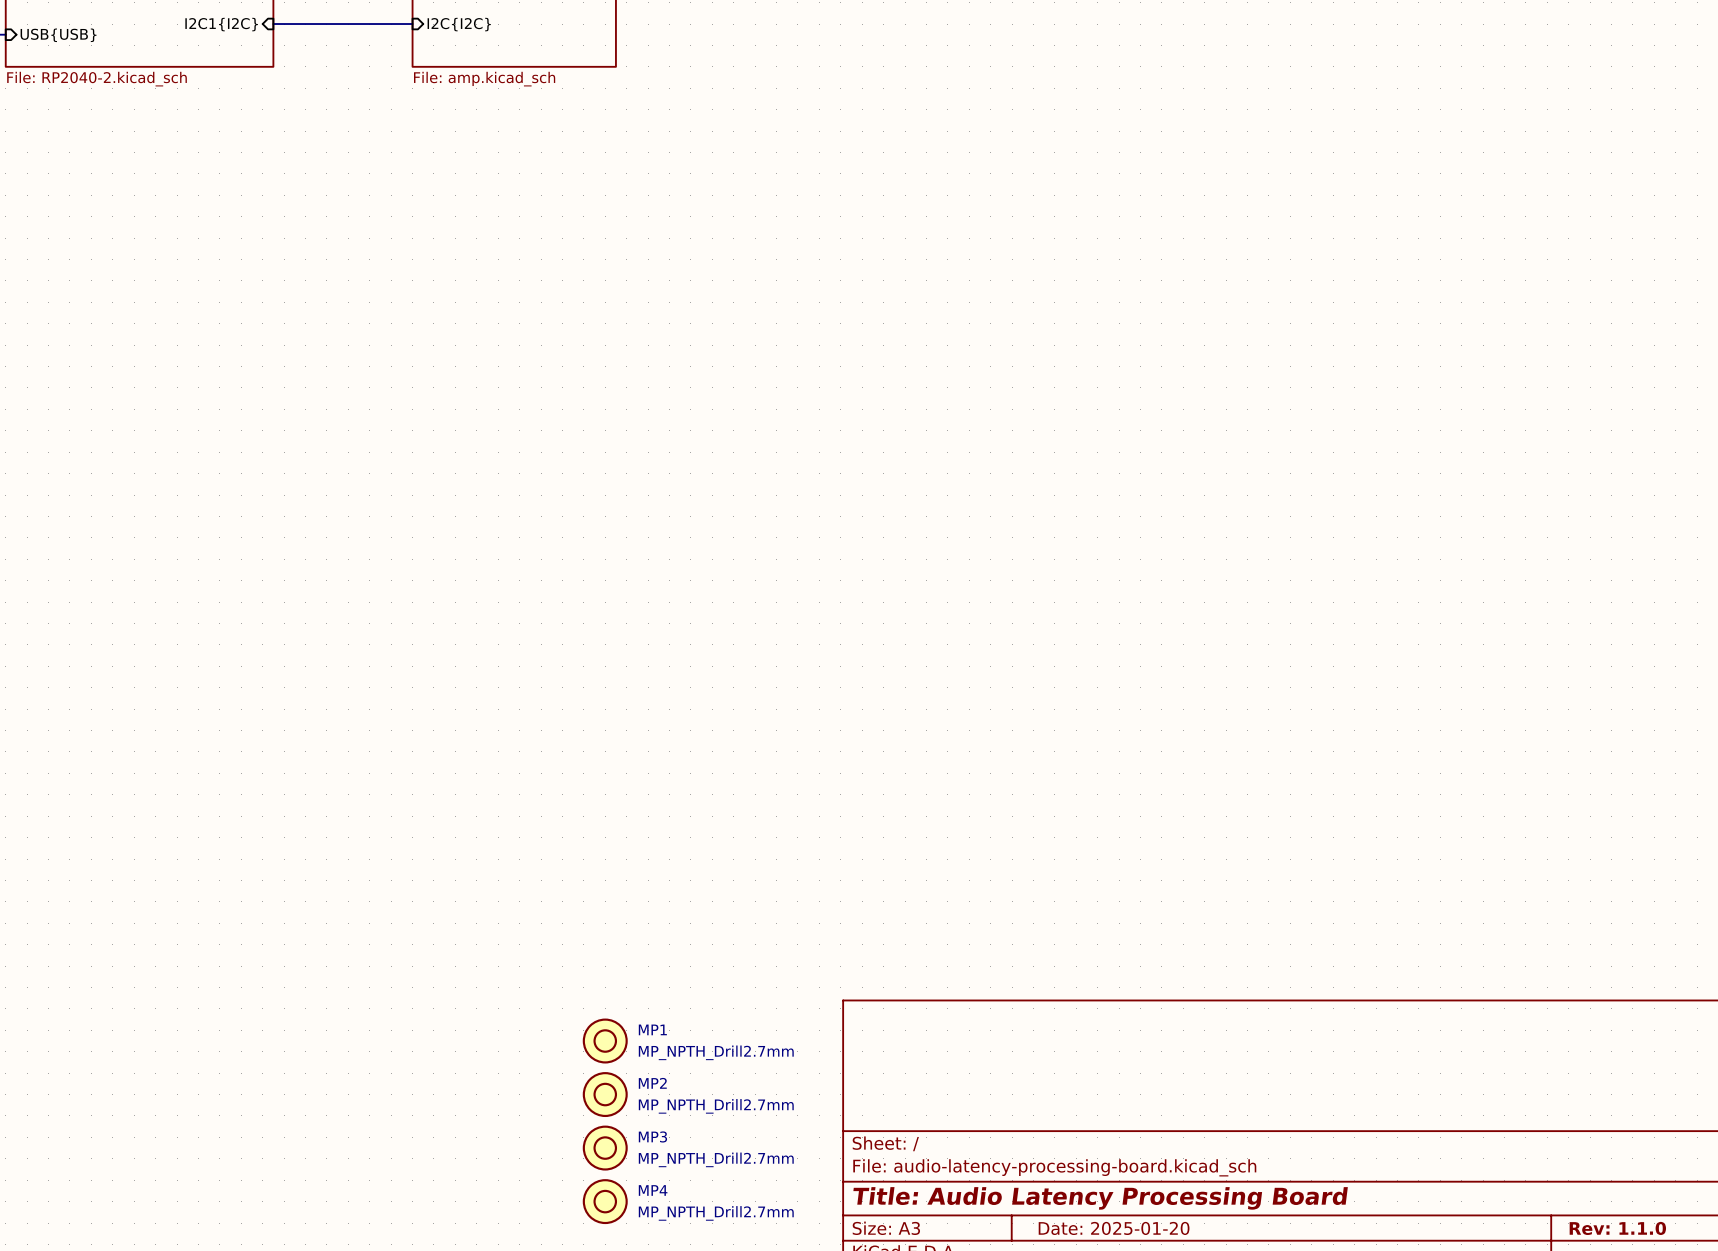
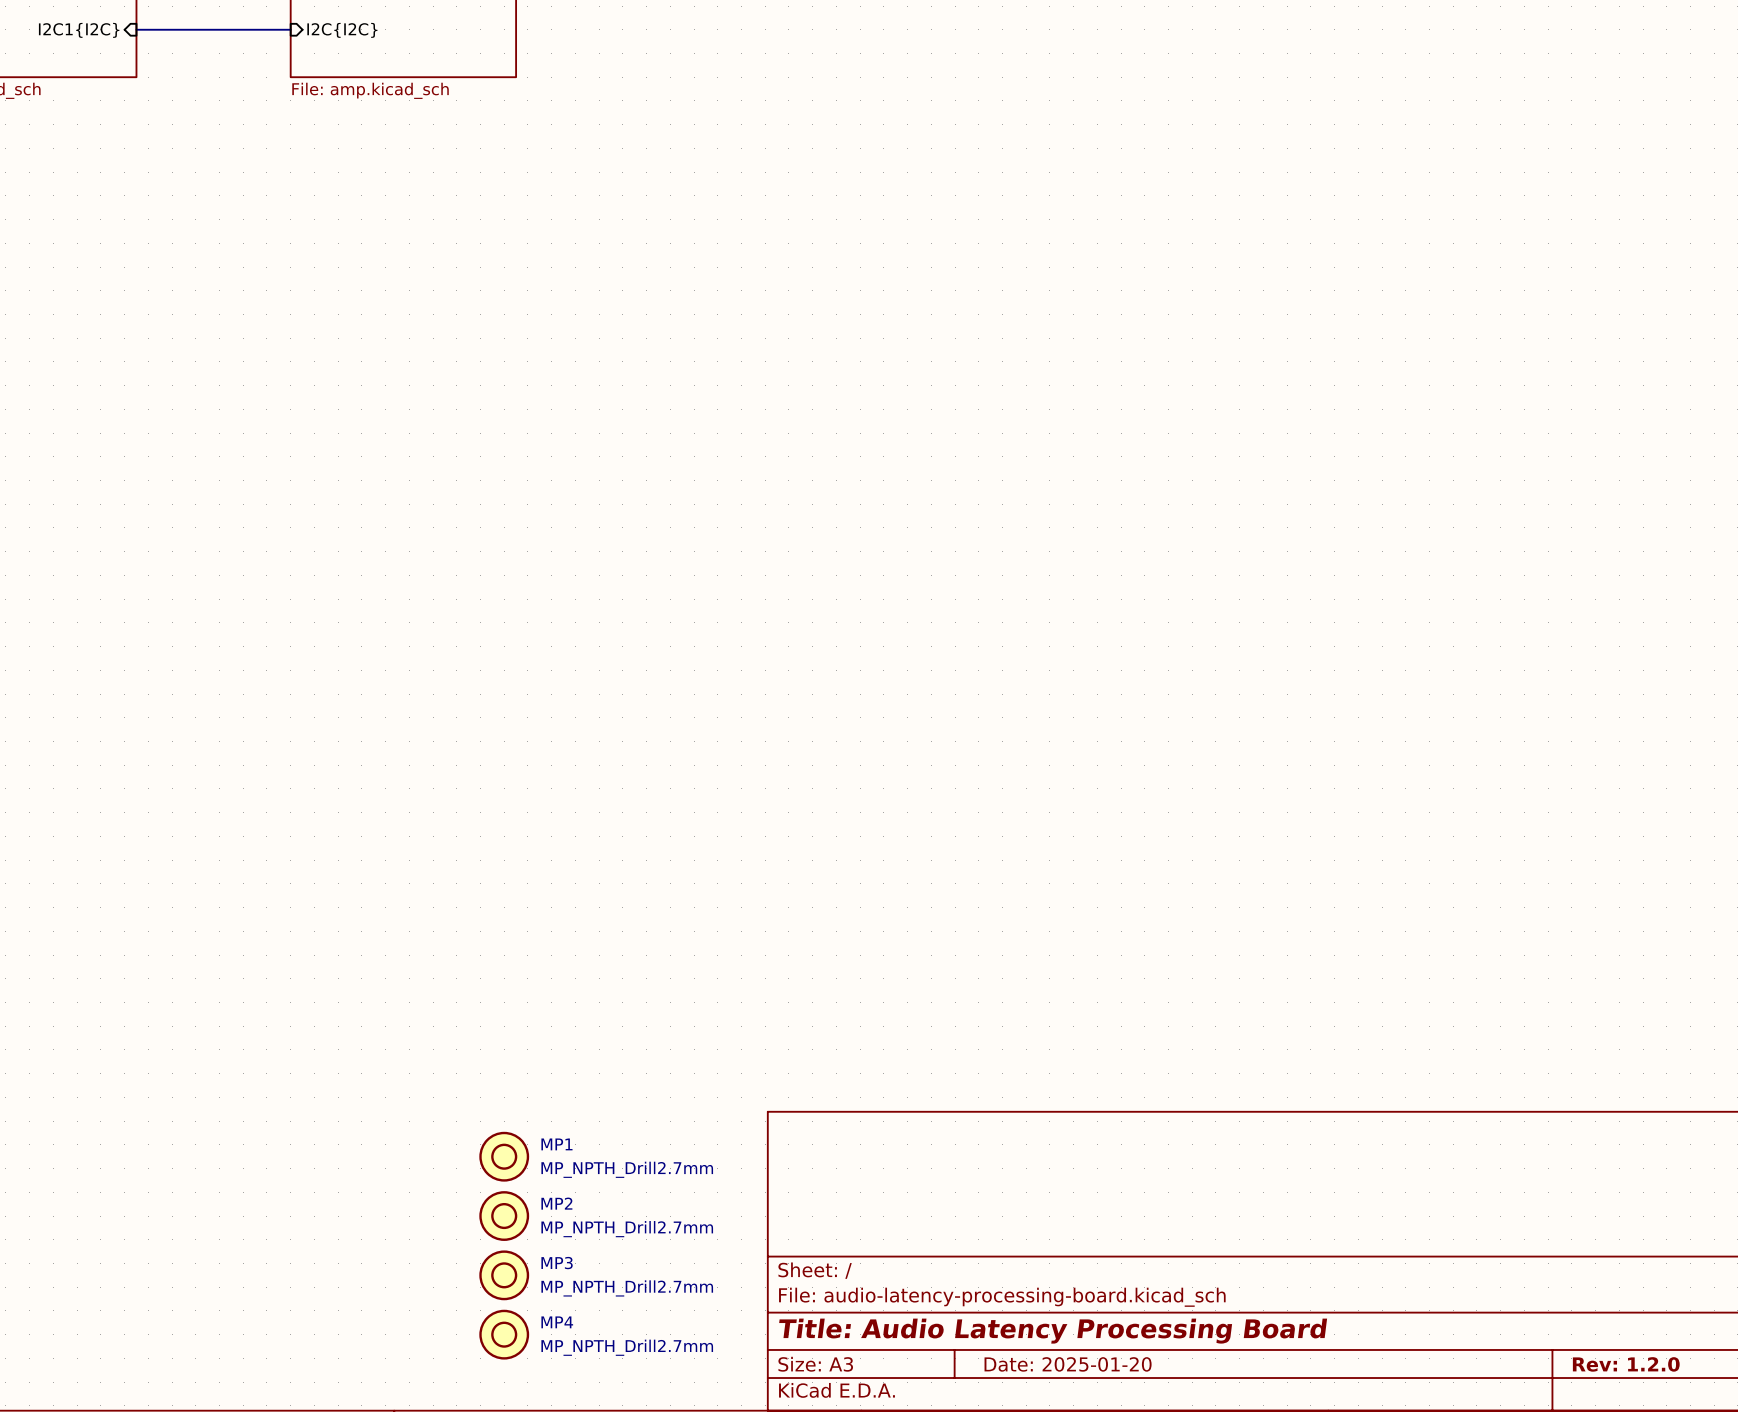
title block: Rev: 1.1.0 (1617, 1228) -> Rev: 1.2.0 (1626, 1364)

